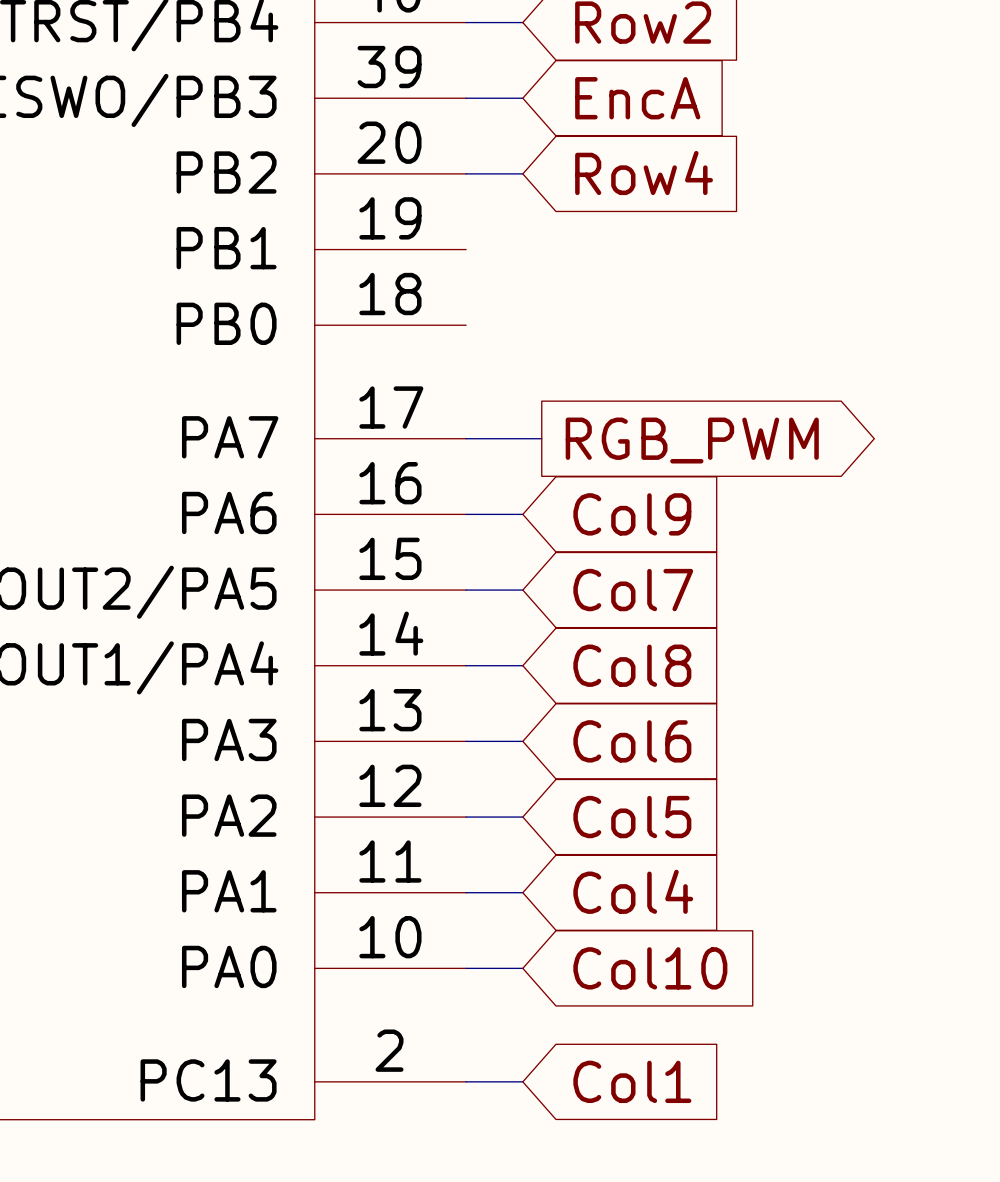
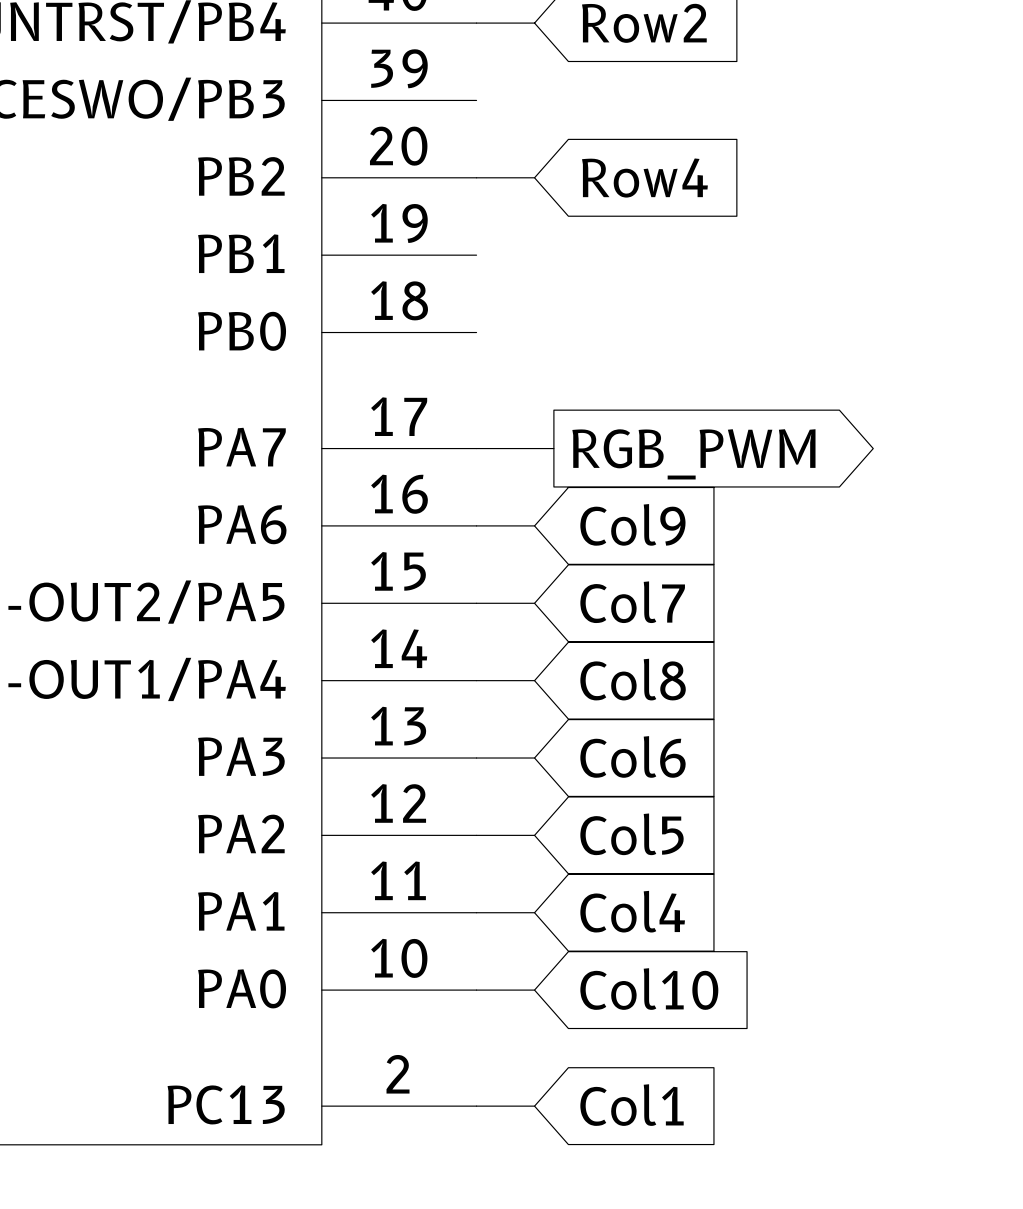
wire: (466, 98) (522, 98) -> none
global label: EncA (637, 98) -> none

